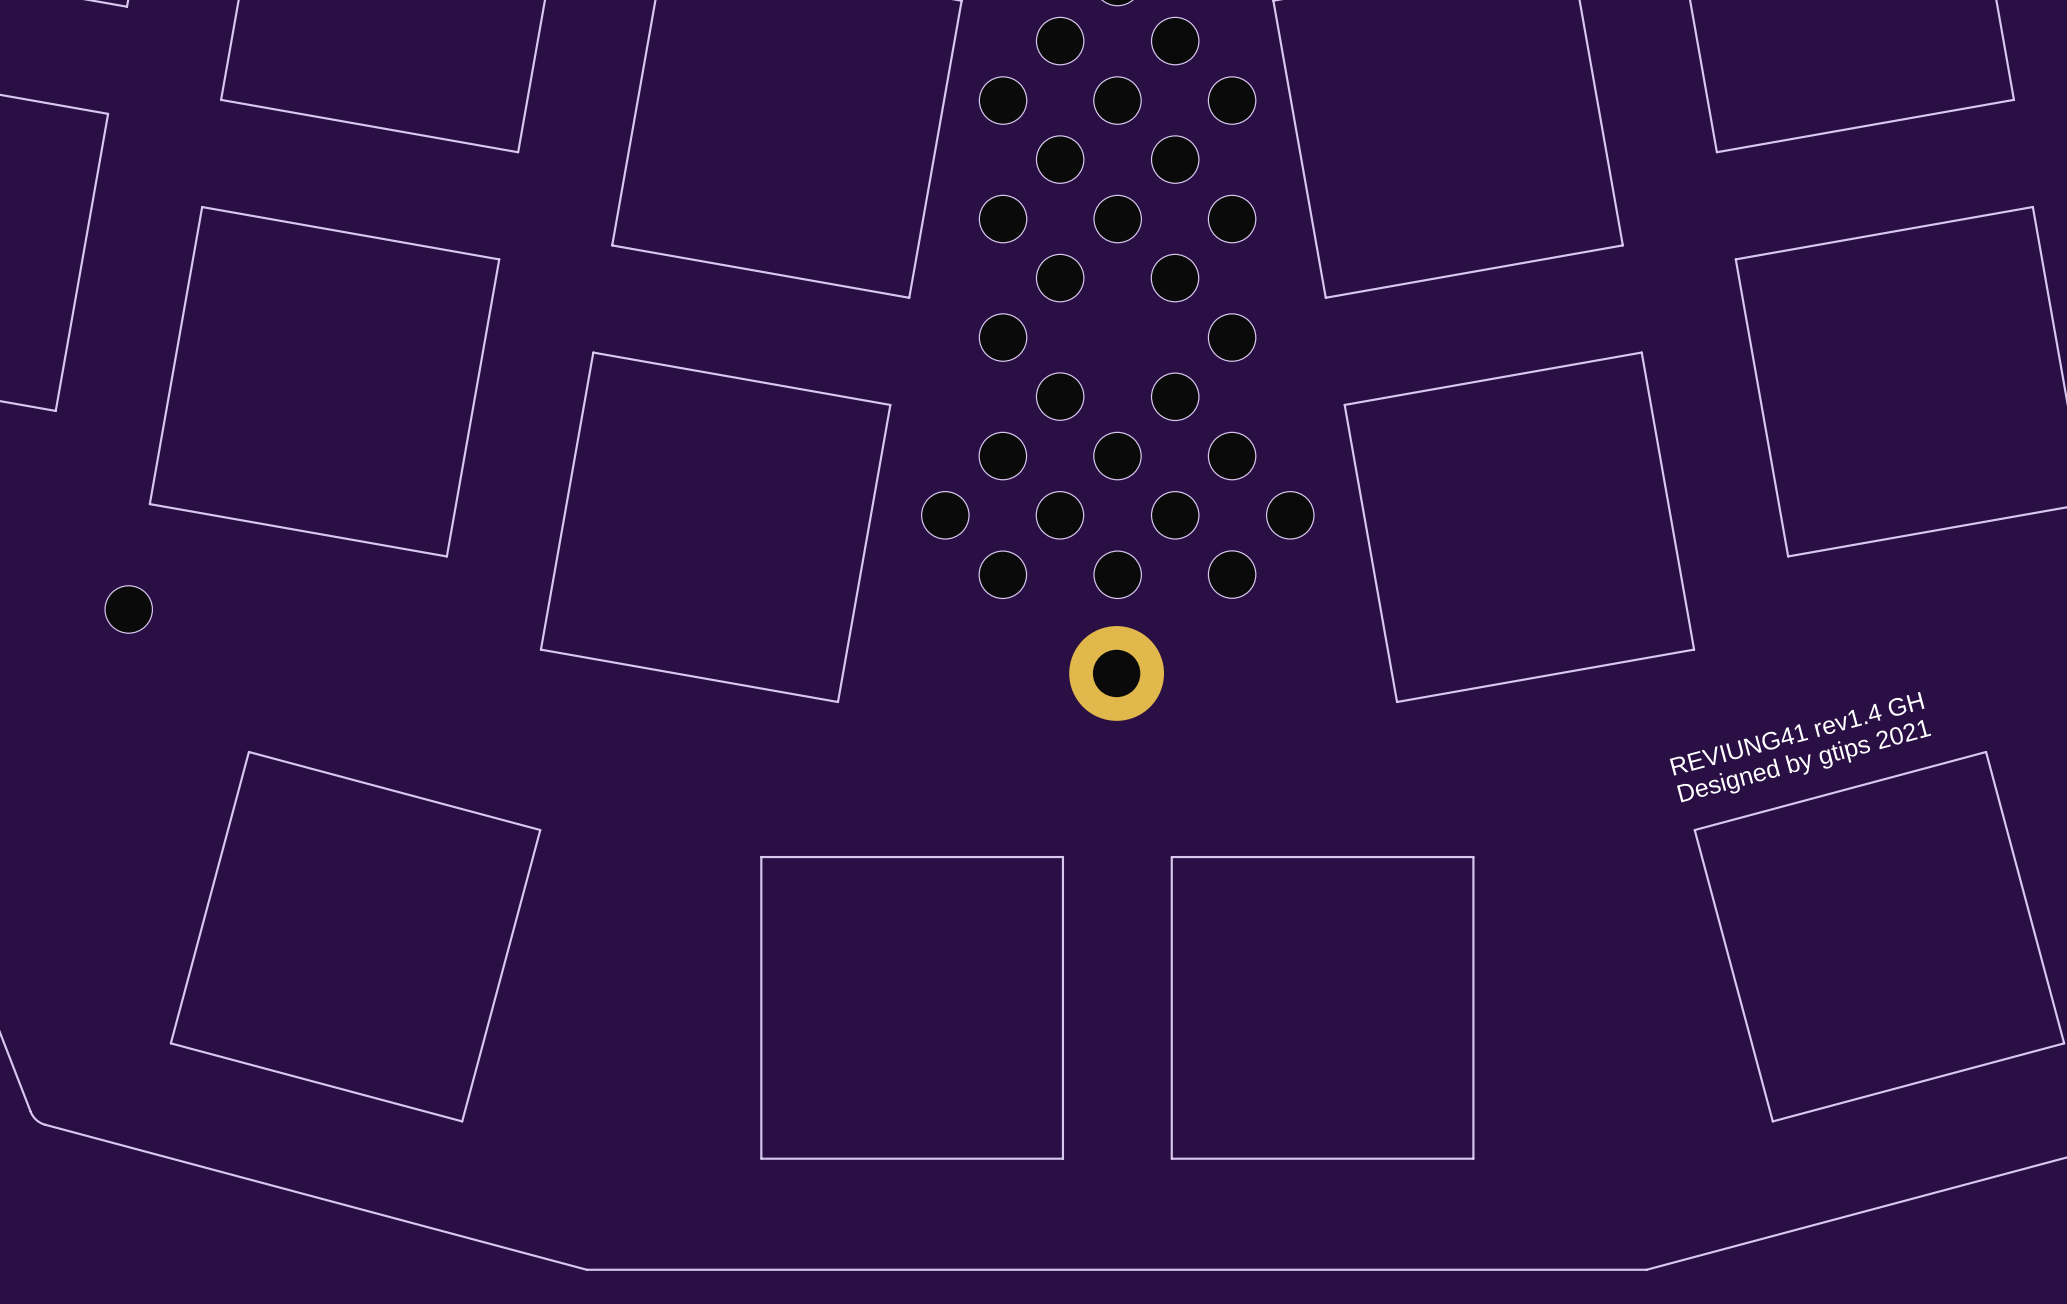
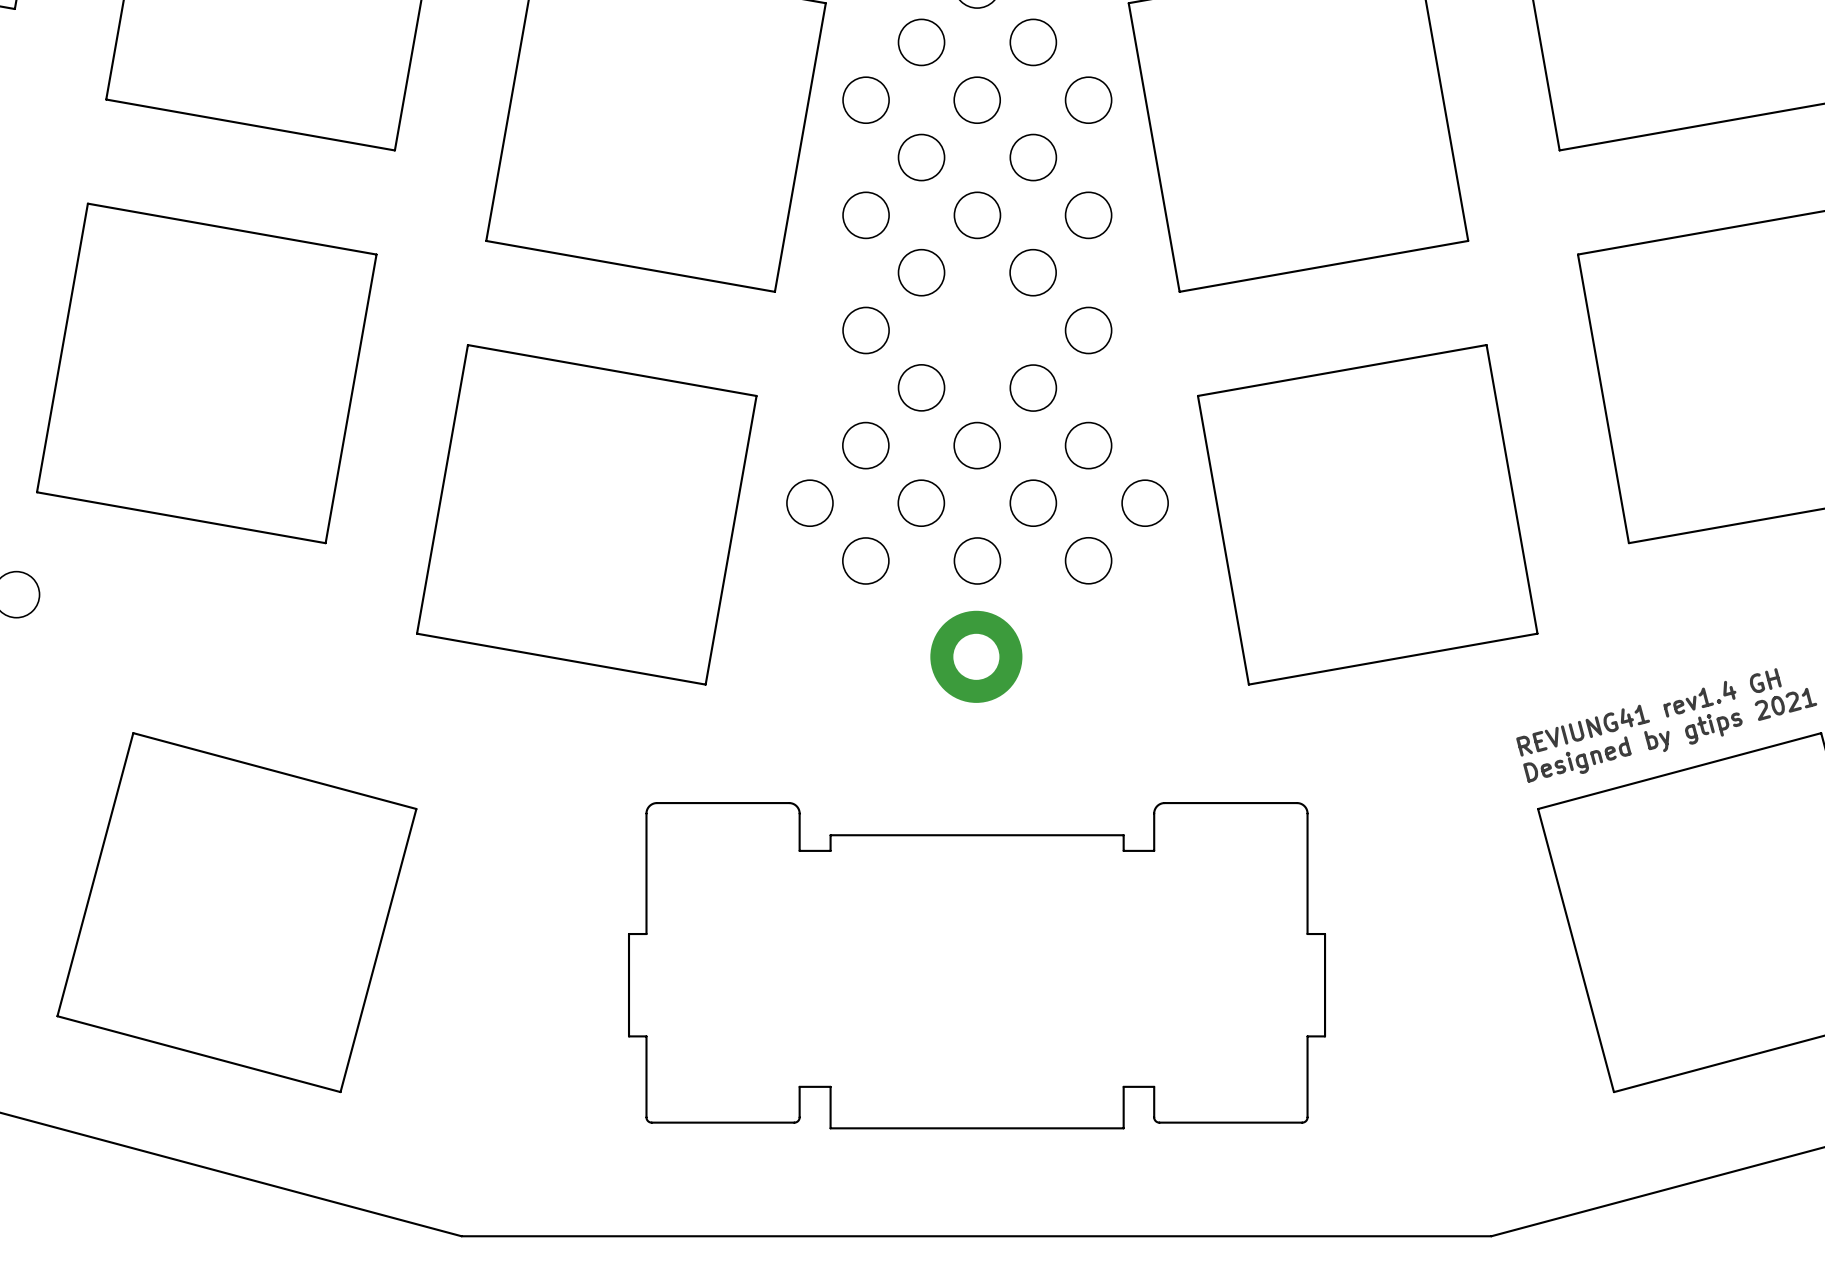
board edge: none -> (1297, 803) (1303, 805) (1307, 812) (1307, 934) (1325, 934) (1325, 1036) (1307, 1036) (1307, 1117) (1304, 1122) (1158, 1122) (1154, 1117) (1154, 1086) (1123, 1086) (1123, 1128) (830, 1128) (830, 1086) (799, 1086) (799, 1117) (795, 1122) (651, 1122) (647, 1119) (646, 1036) (629, 1036) (629, 934) (646, 934) (646, 813) (651, 804) (792, 803) (799, 811) (799, 850) (830, 850) (830, 835) (1123, 835) (1123, 850) (1154, 850) (1154, 811) (1161, 803) (1297, 803)
board edge: (1062, 857) (1062, 1158) (761, 1158) (761, 857) (1062, 857) -> none
board edge: (1473, 857) (1171, 857) (1171, 1158) (1473, 1158) (1473, 857) -> none

